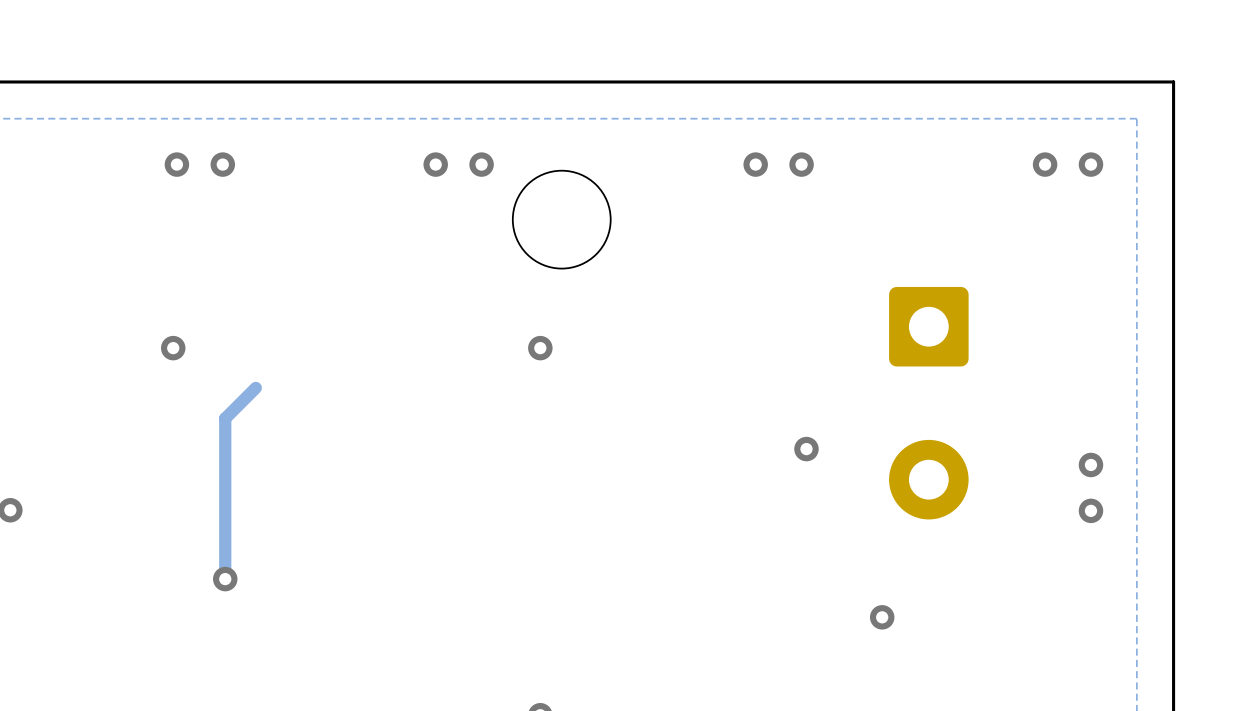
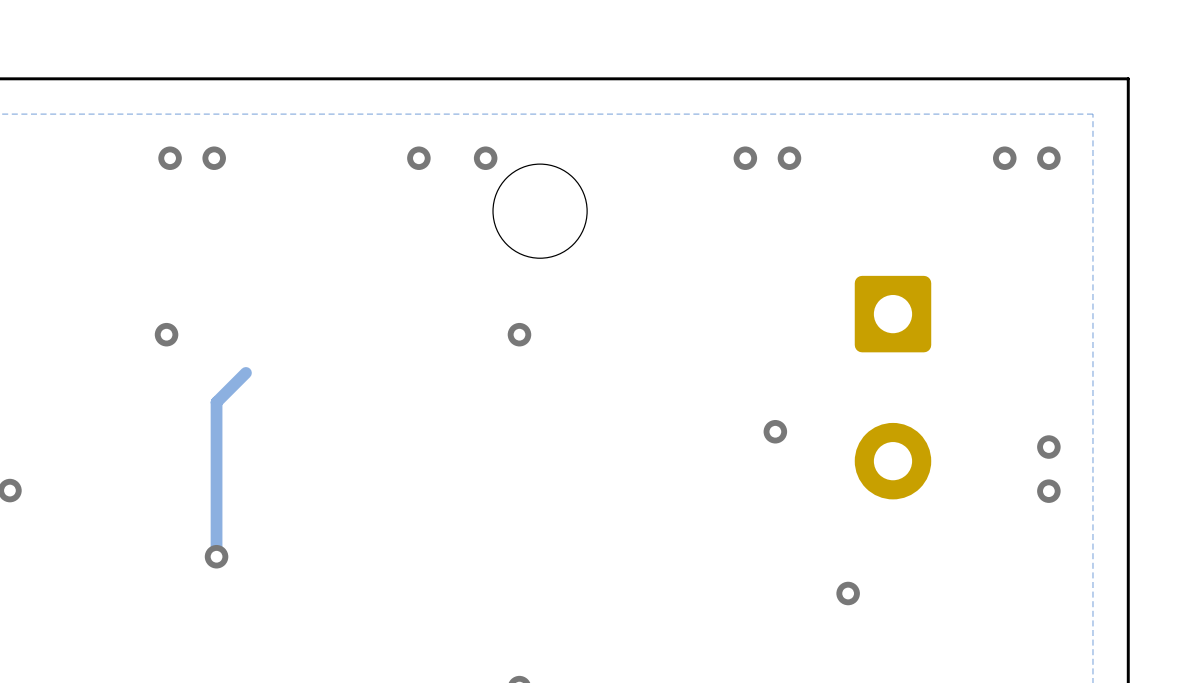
via position: (481, 164) -> (485, 158)
via position: (755, 164) -> (745, 158)
via position: (801, 164) -> (789, 158)

